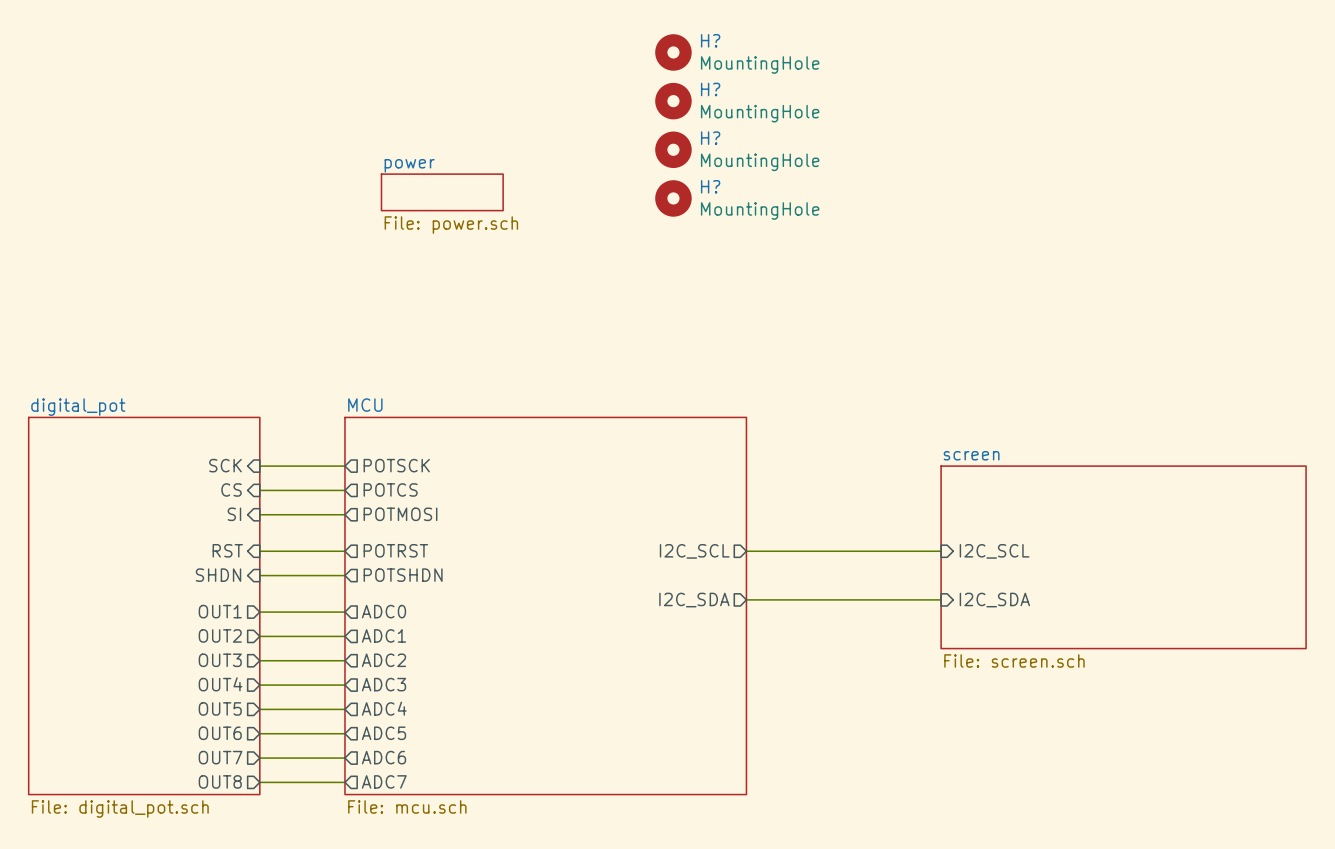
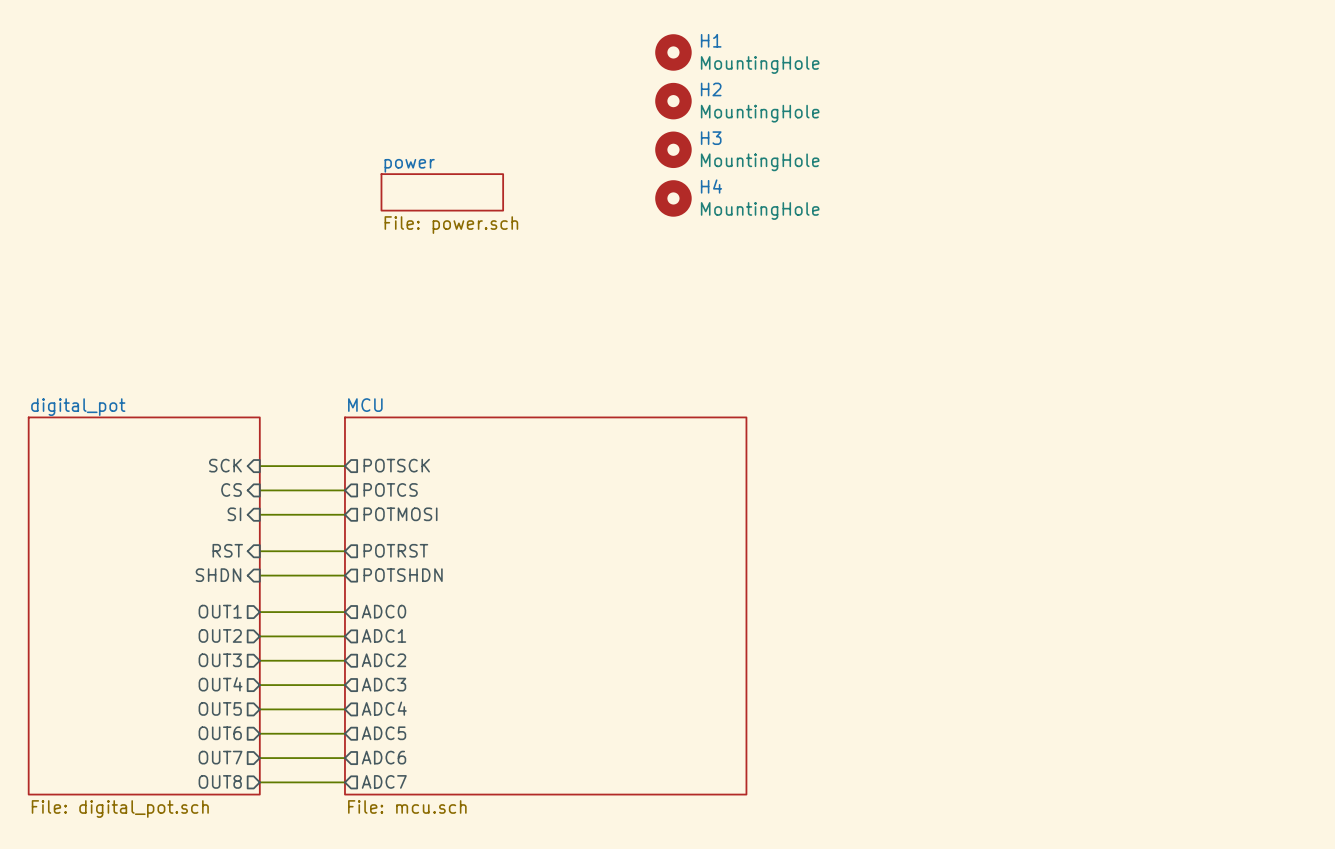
H? name: H? (710, 40) -> H1 (711, 40)
H? name: H? (710, 89) -> H2 (711, 89)
H? name: H? (710, 138) -> H3 (711, 138)
H? name: H? (710, 186) -> H4 (711, 186)
sheet pin: I2C_SCL (694, 551) -> none
wire: (746, 551) (941, 551) -> none
sheet pin: I2C_SCL (994, 551) -> none
sheet screen: File: screen.sch (1123, 557) -> none
wire: (746, 599) (941, 599) -> none
sheet pin: I2C_SDA (694, 600) -> none
sheet pin: I2C_SDA (994, 600) -> none

